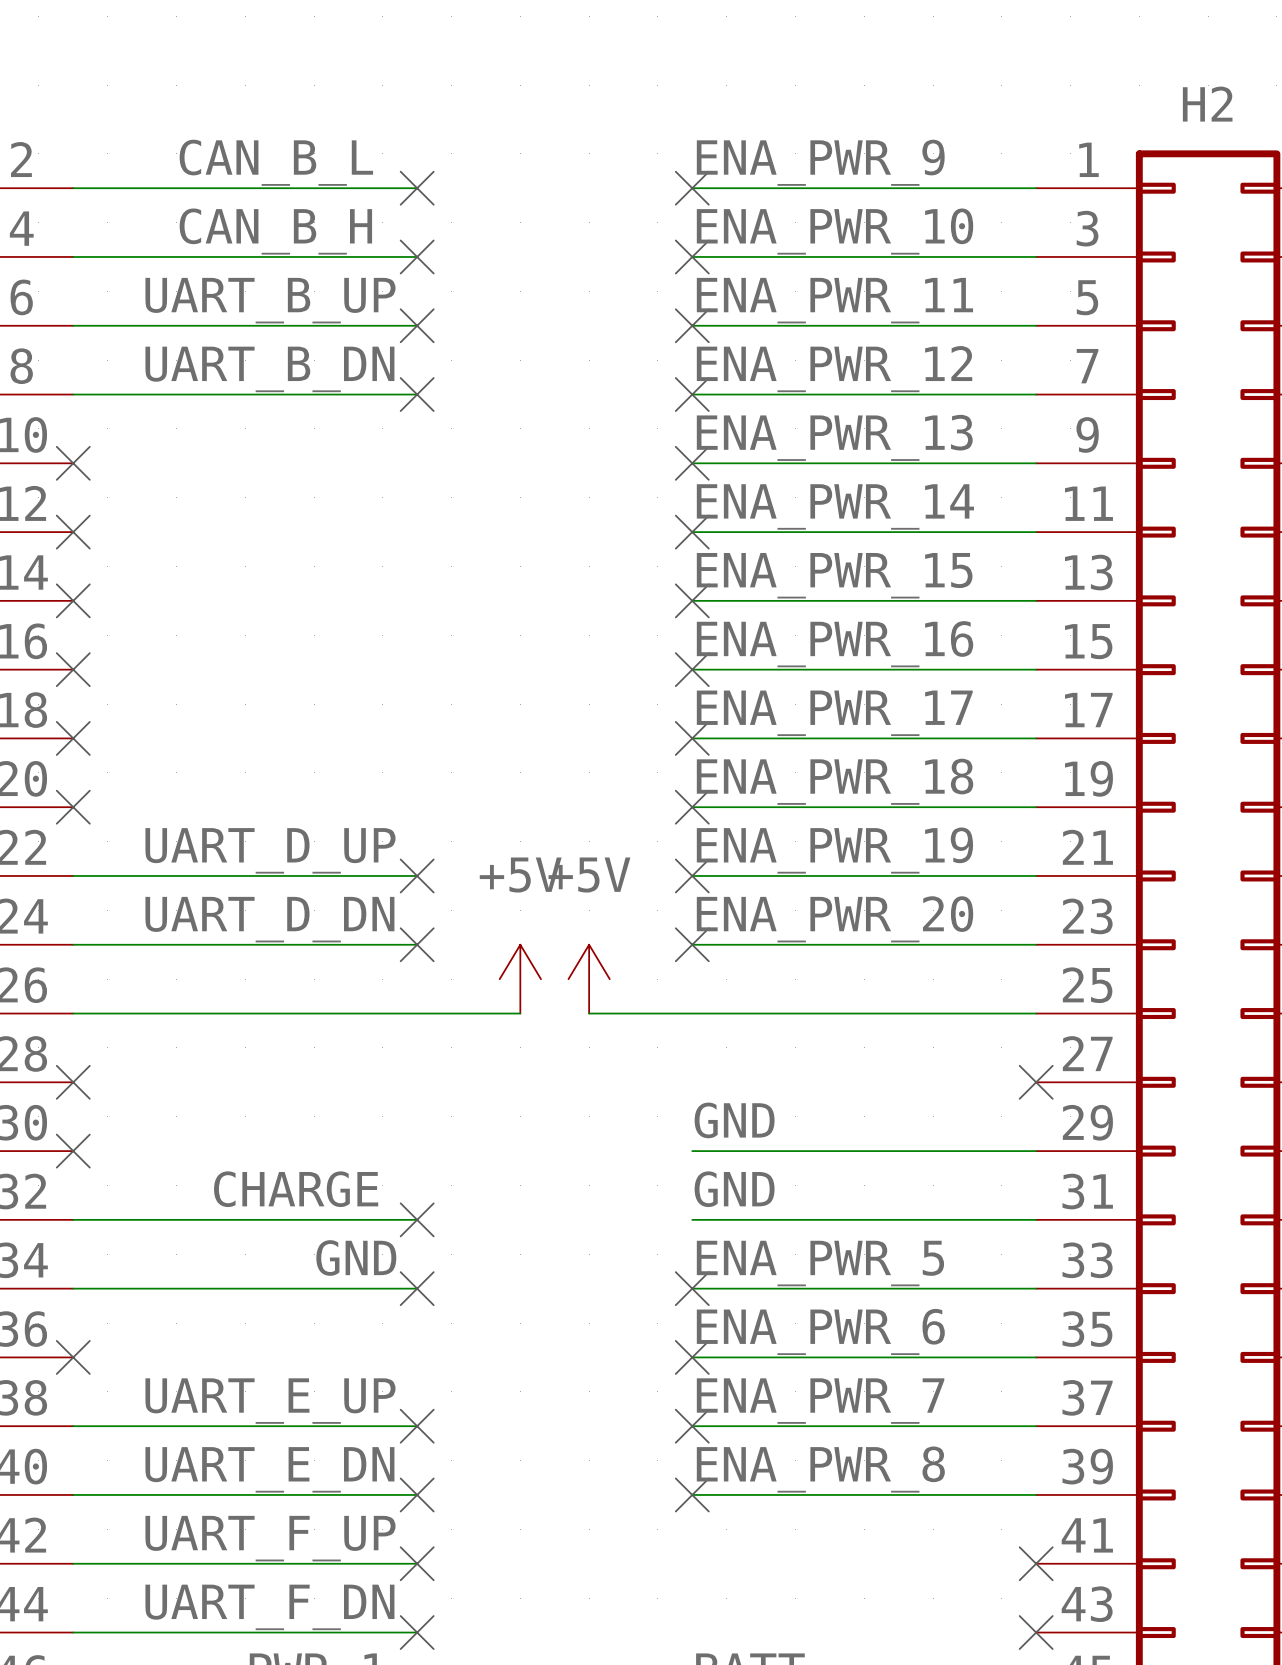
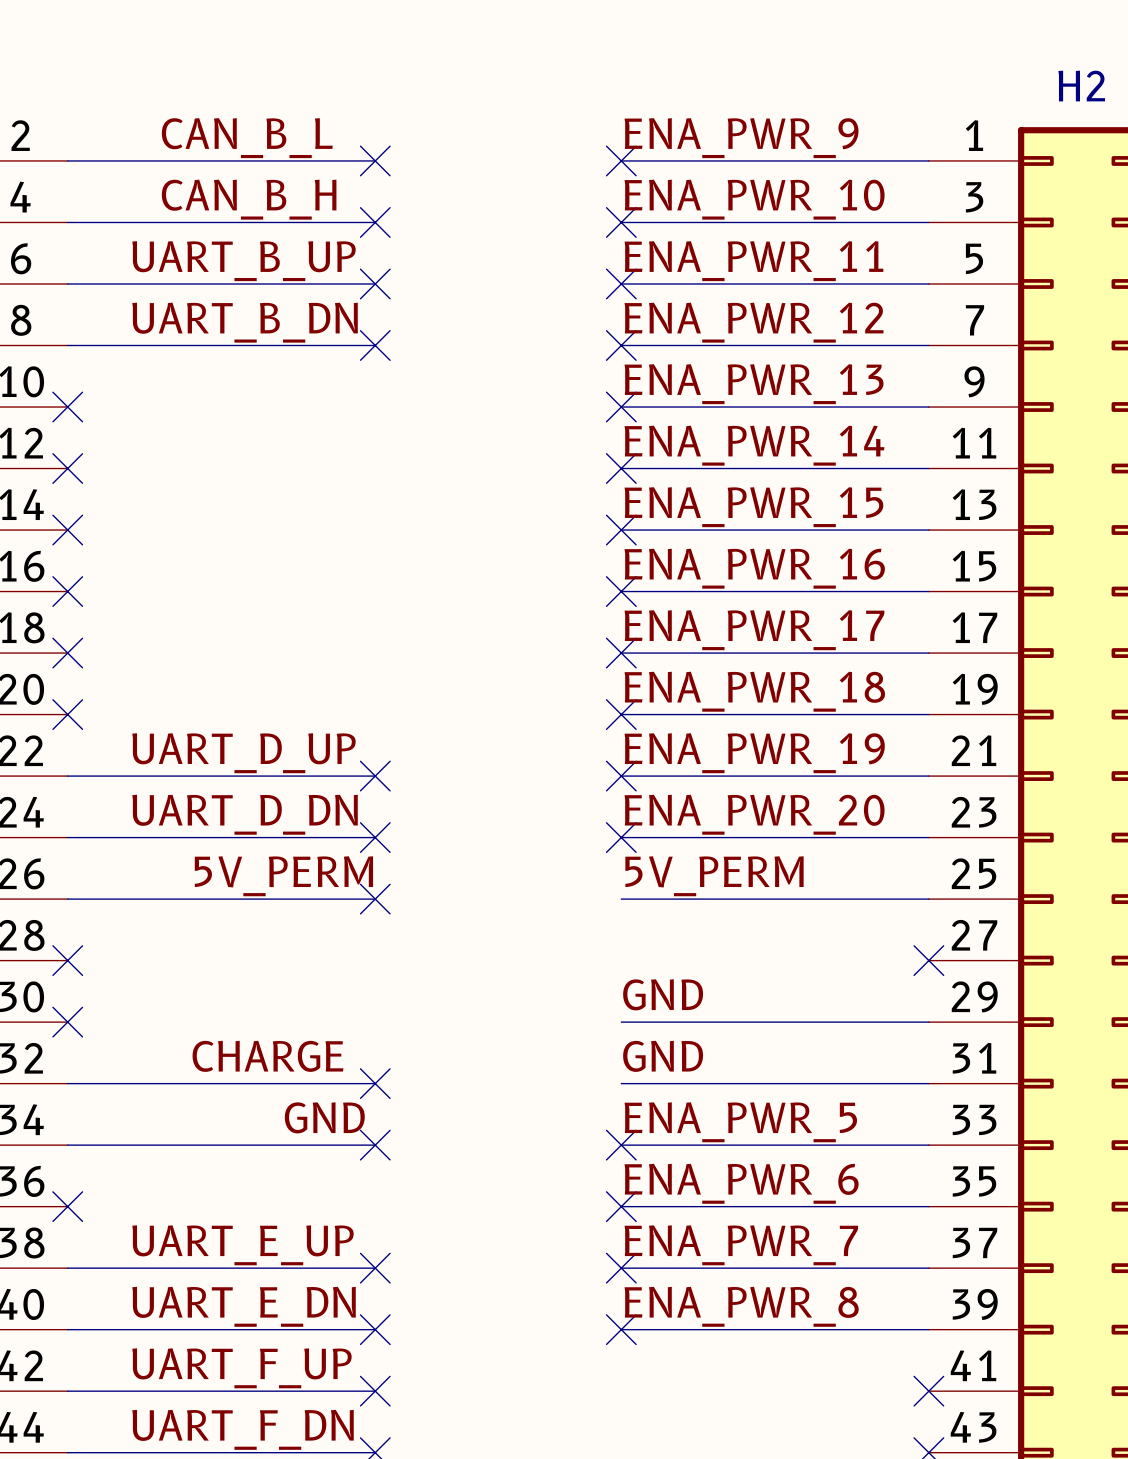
power symbol: +5V (520, 979) -> none
power symbol: +5V (589, 979) -> none
label: none -> 5V_PERM (283, 876)
label: none -> 5V_PERM (714, 876)
wire: (417, 1013) (520, 1013) -> none
no-connect mark: none -> (375, 899)
wire: (589, 1013) (692, 1013) -> none

